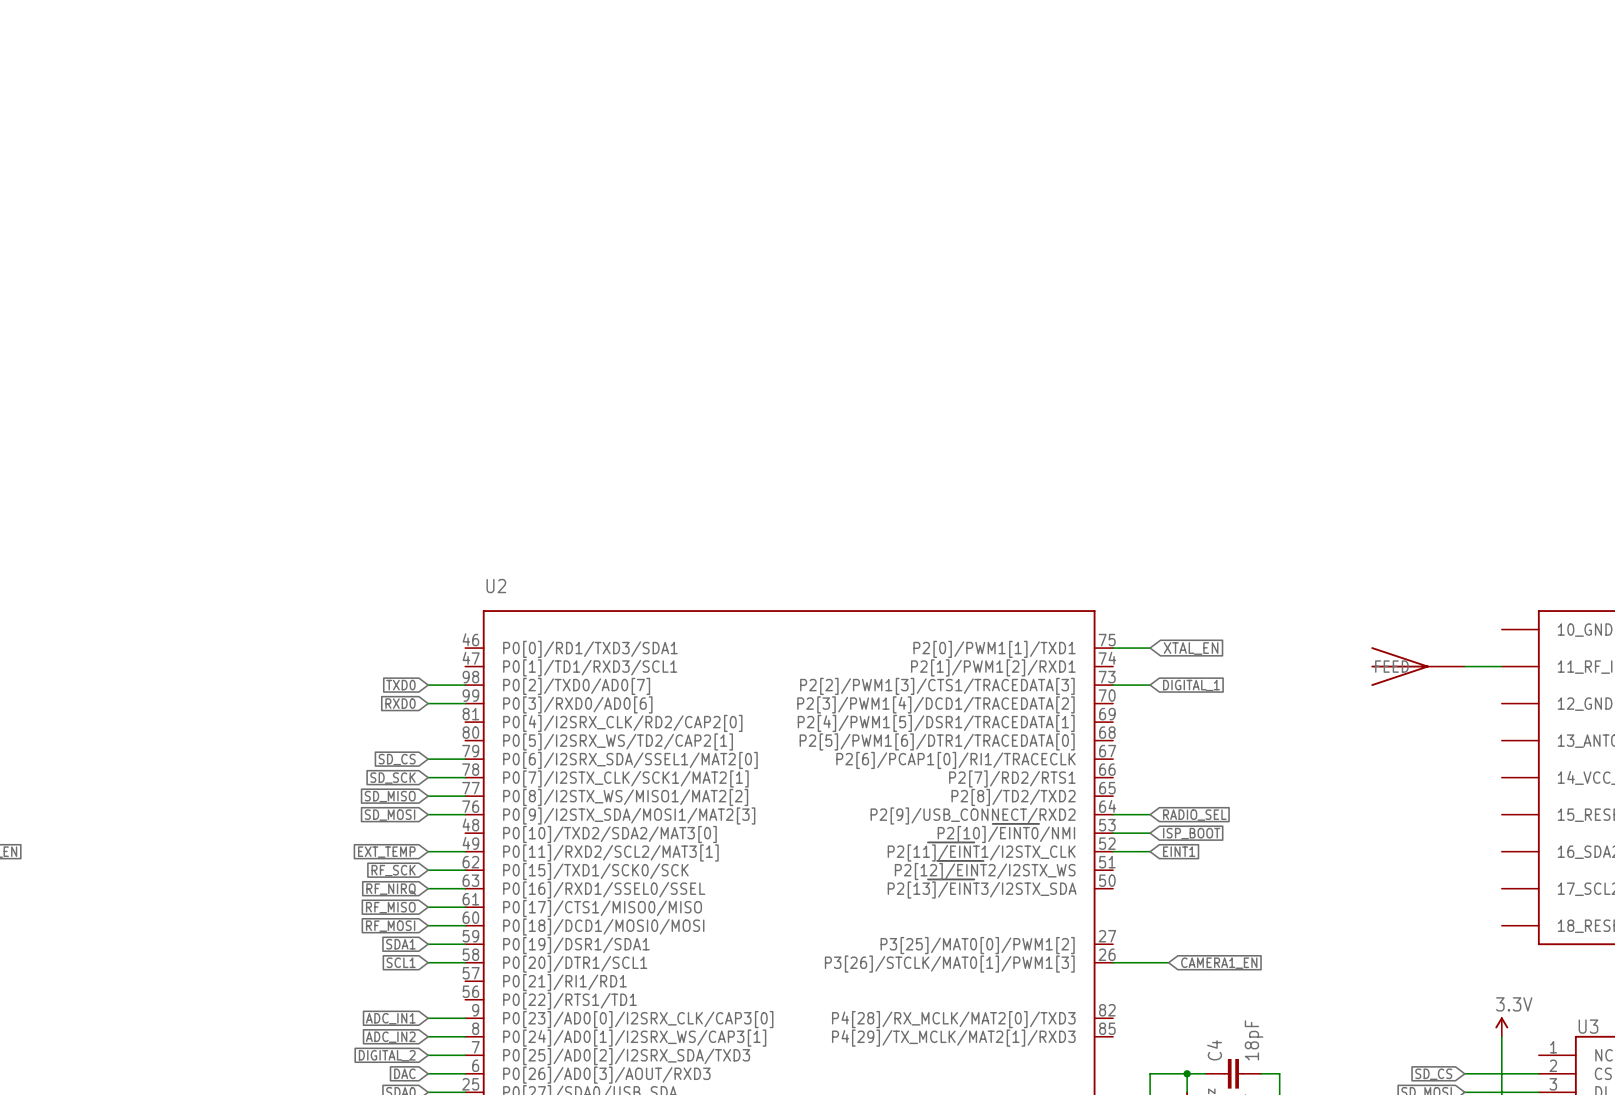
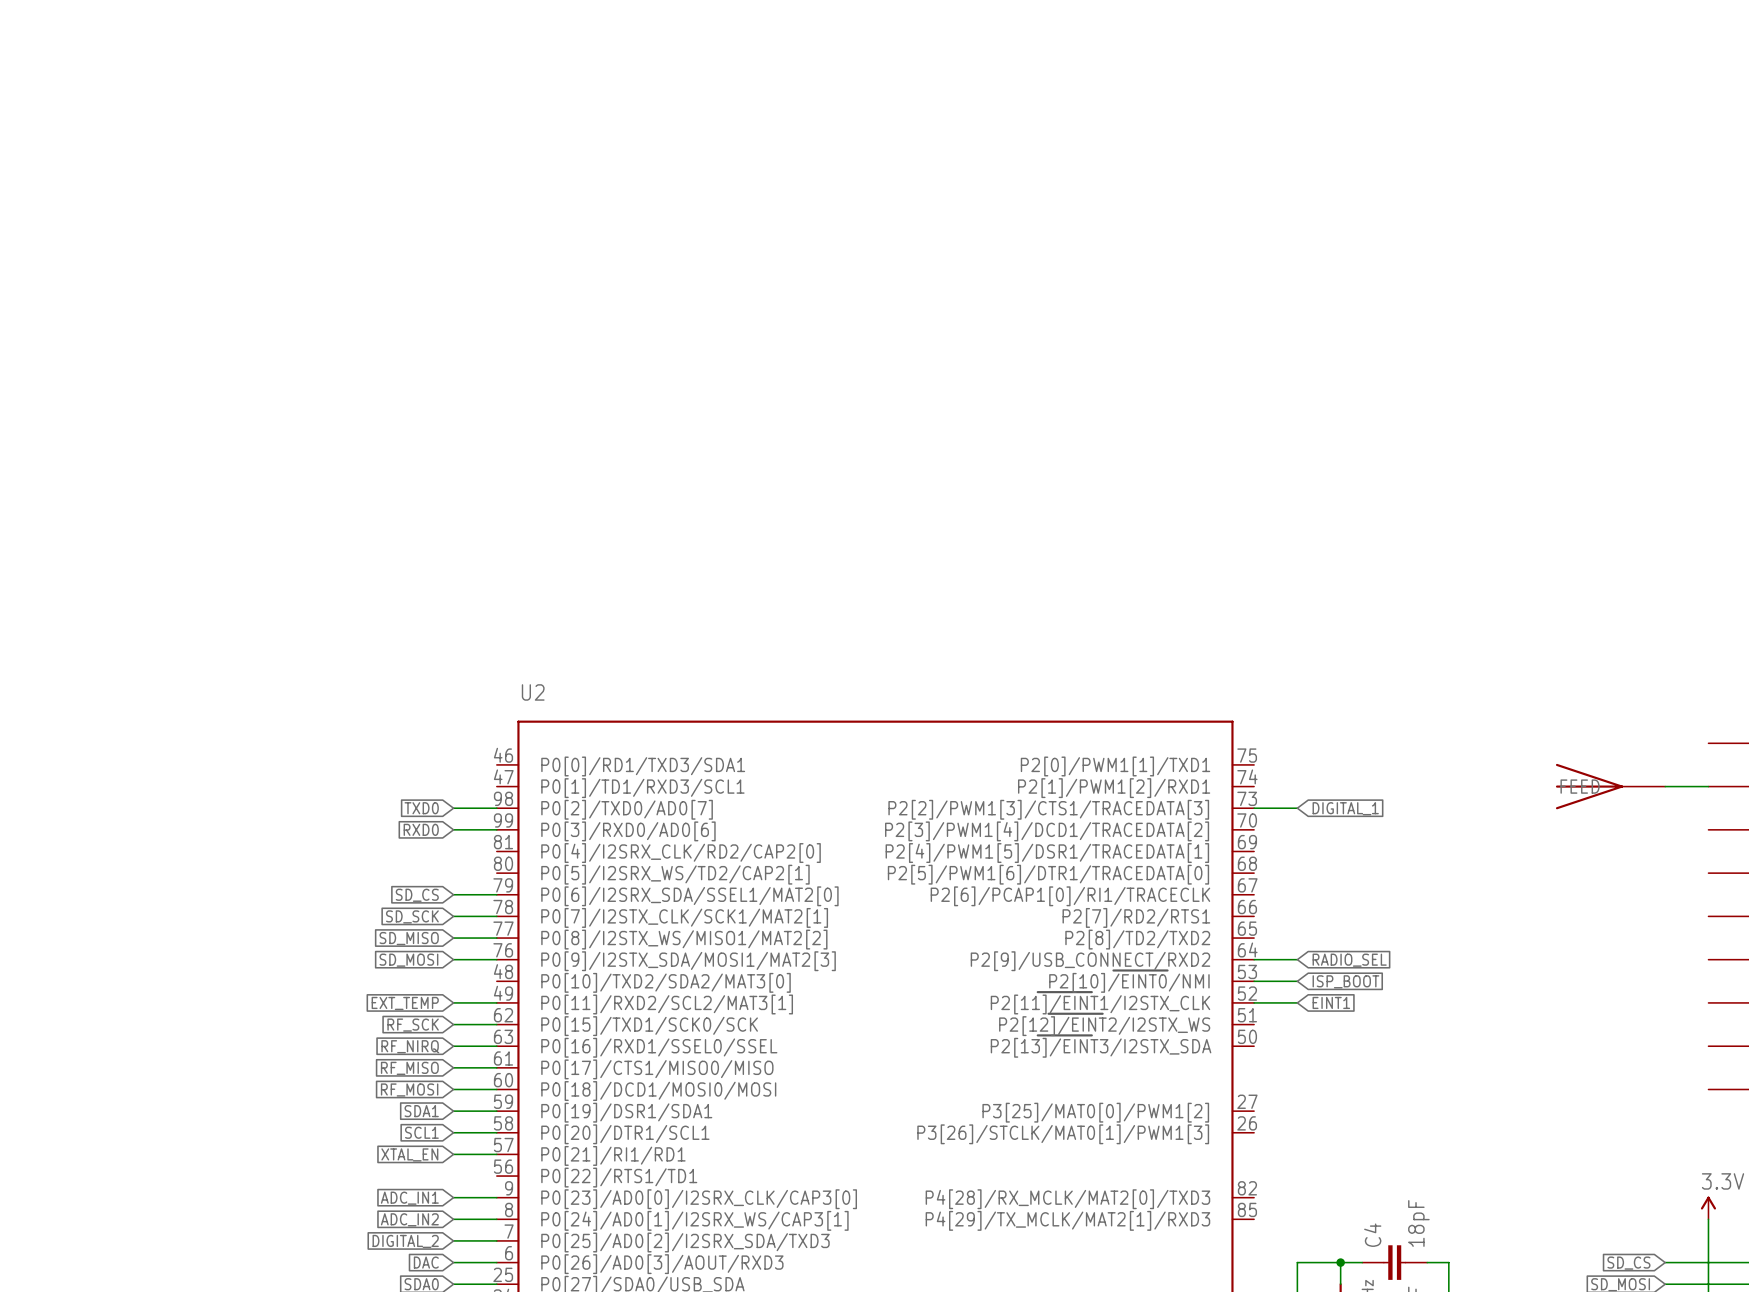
wire: (1113, 648) (1150, 648) -> none
global label: XTAL_EN (1191, 648) -> none
wire: (1113, 962) (1168, 962) -> none
global label: CAMERA1_EN (1219, 963) -> none
global label: none -> XTAL_EN (409, 1154)
wire: none -> (453, 1154) (496, 1154)

